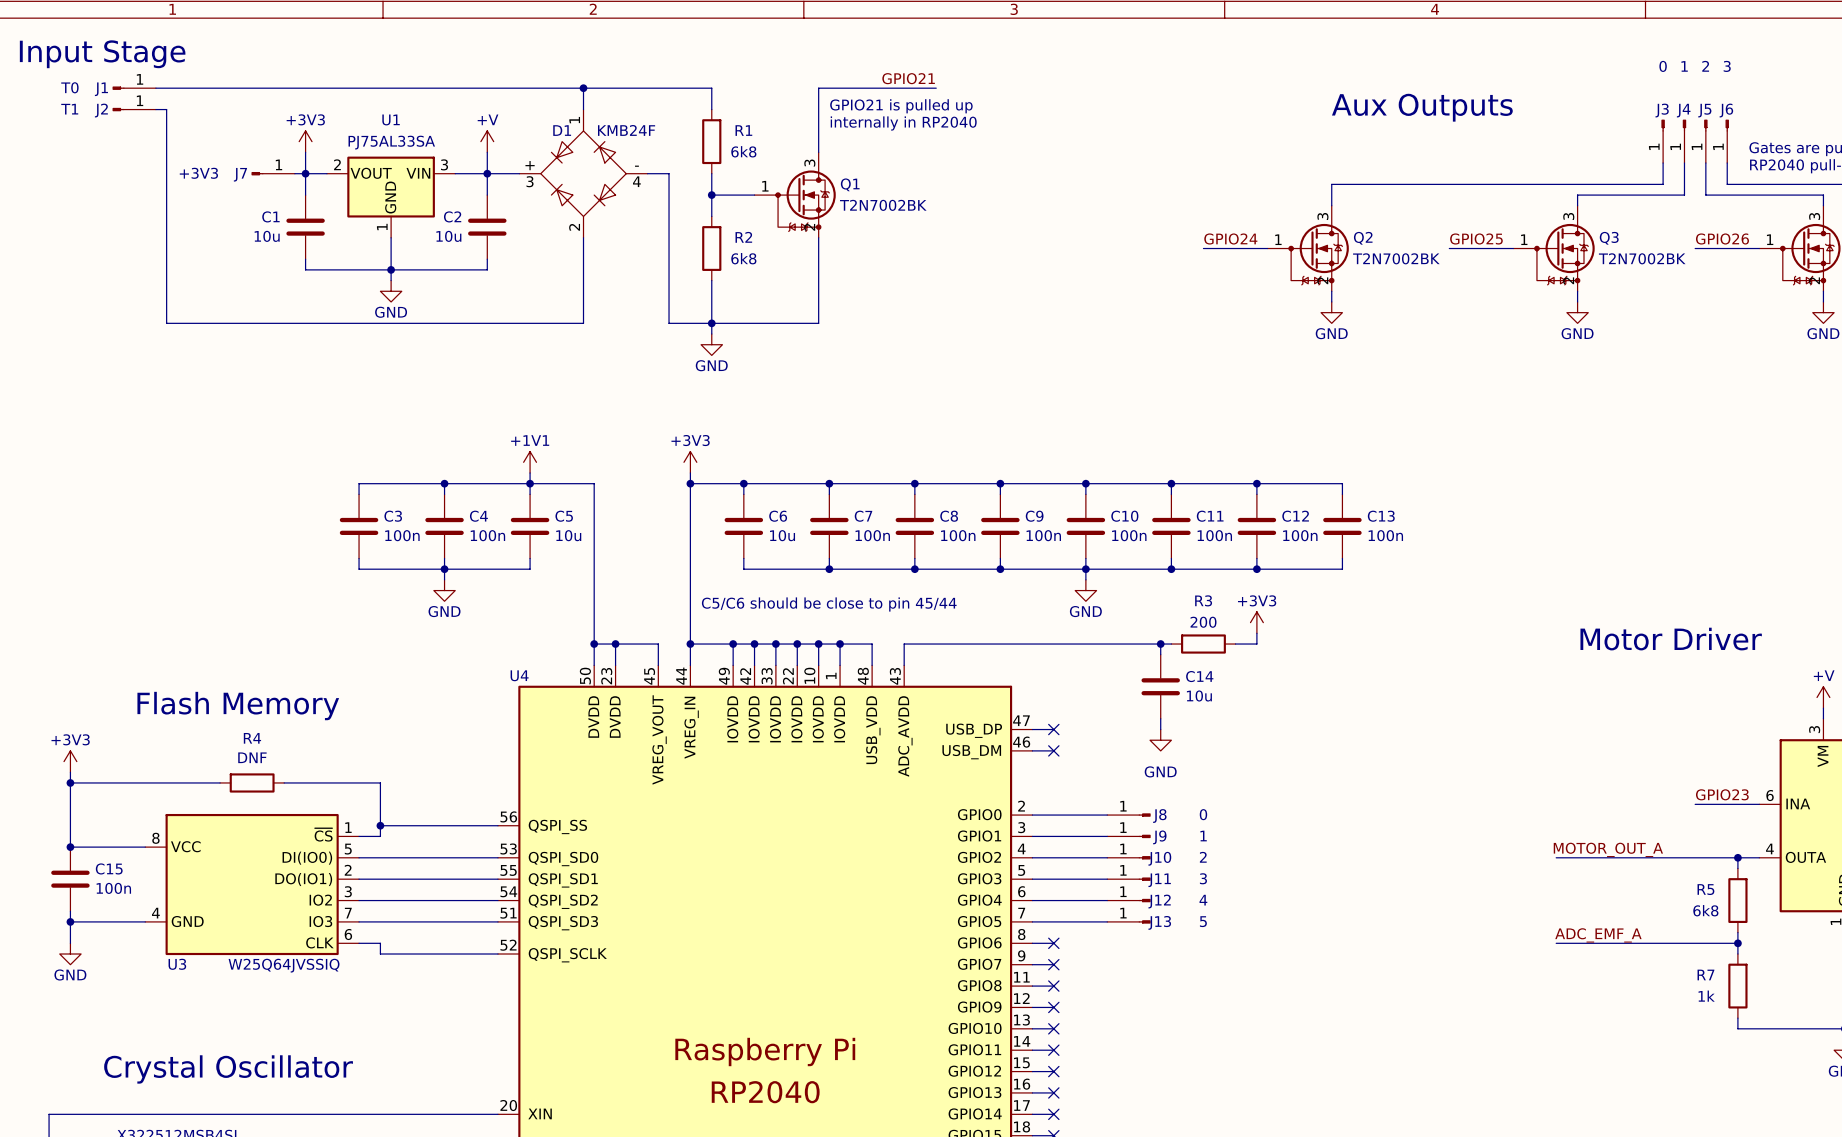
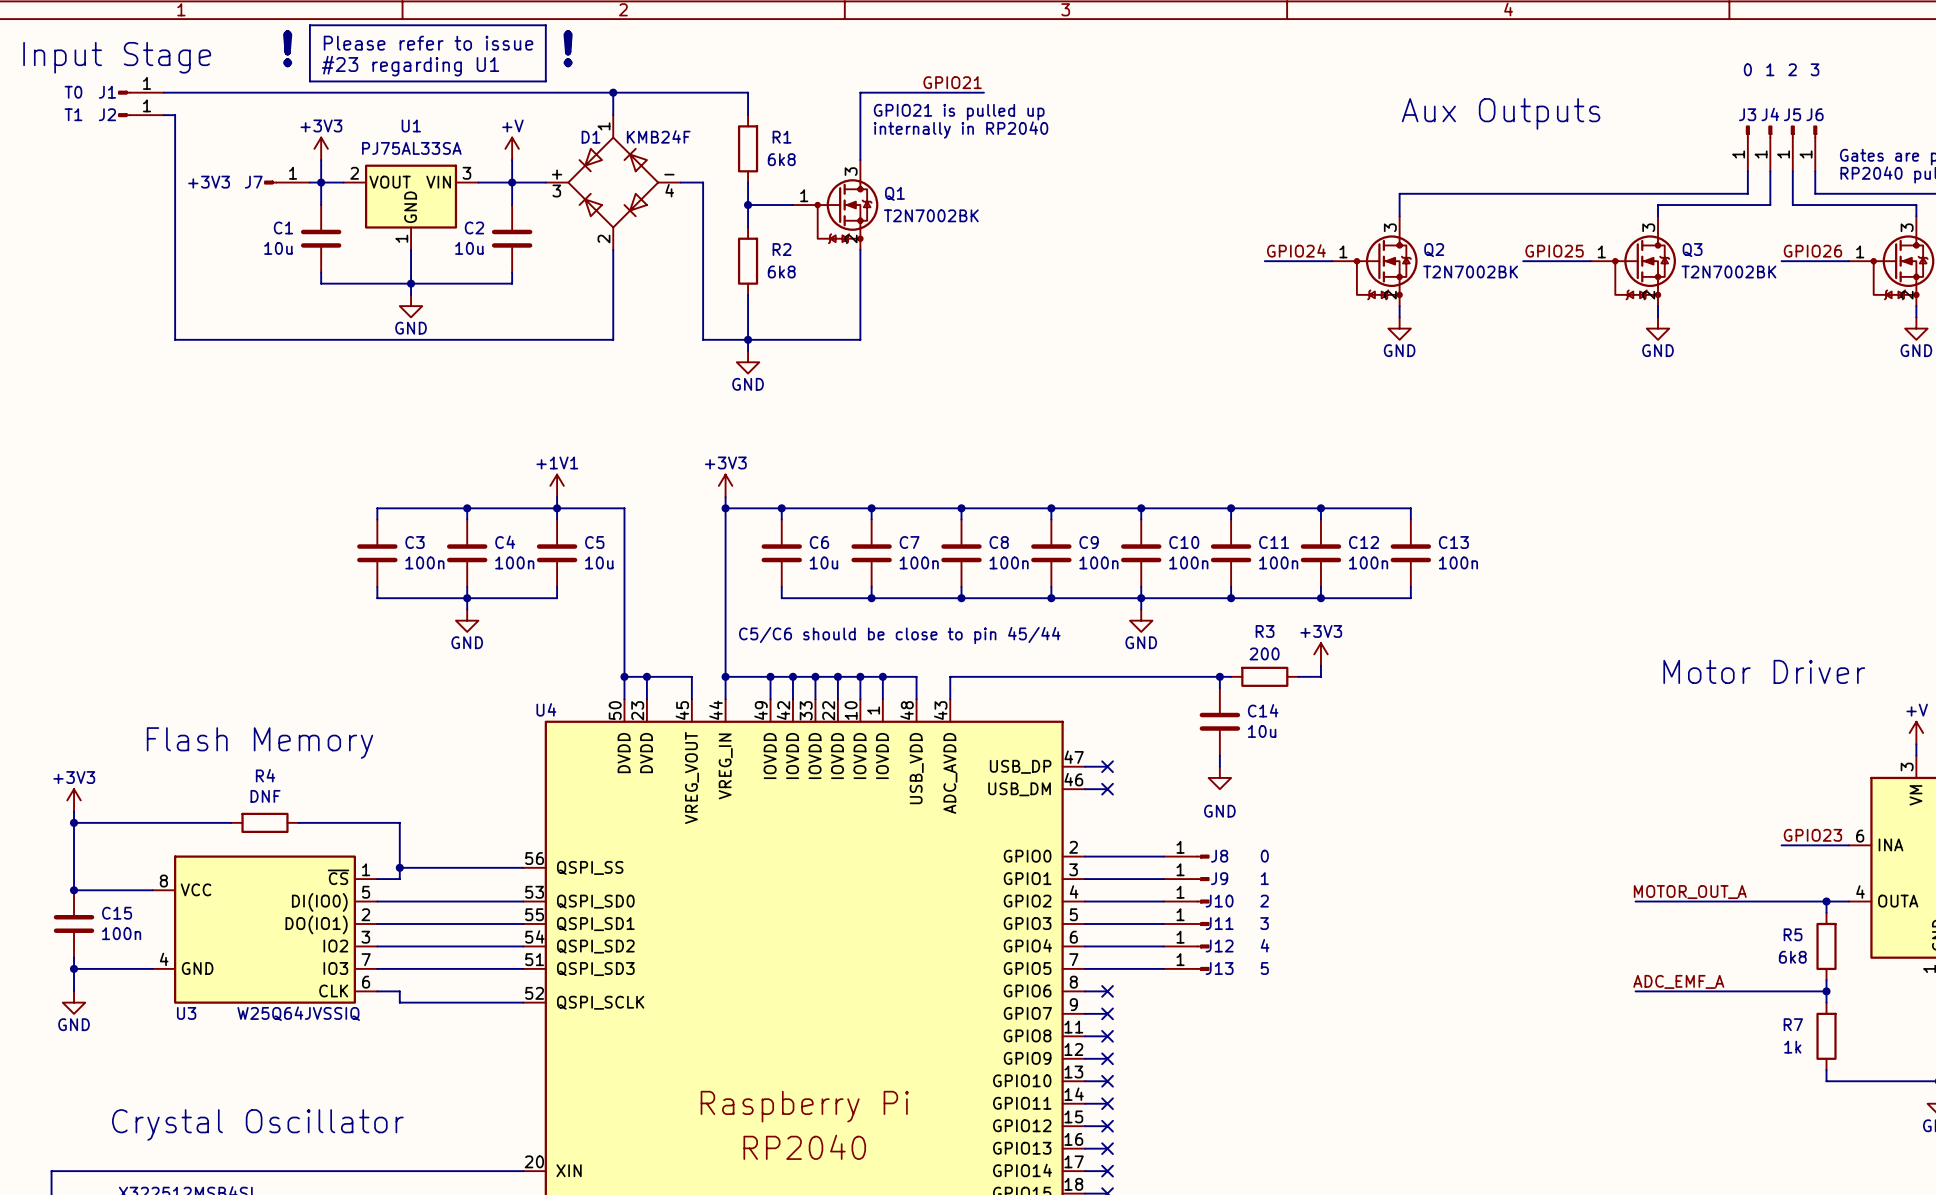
line: none -> (309, 25) (545, 25) (545, 81) (309, 81) (309, 25)
text: none -> Please refer to issue (428, 43)
text: none -> ! (287, 48)
text: none -> ! (568, 48)
text: none -> #23 regarding U1 (410, 66)

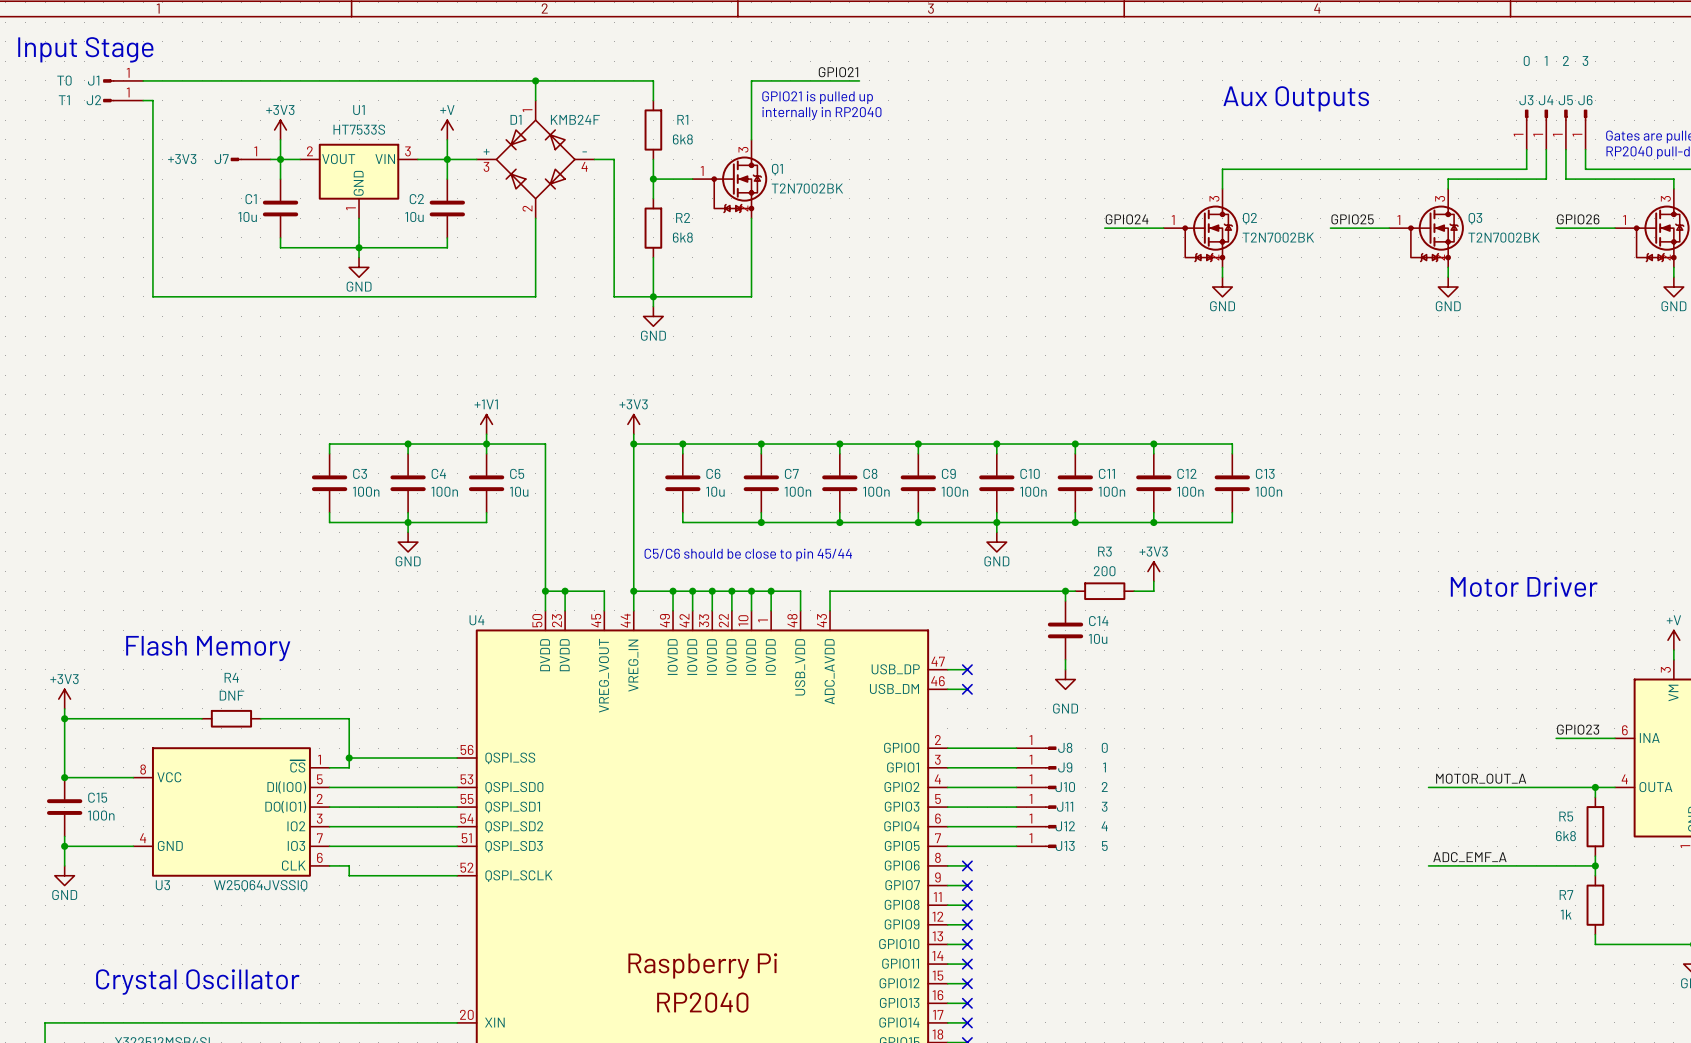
line: (309, 25) (545, 25) (545, 81) (309, 81) (309, 25) -> none
text: Please refer to issue (428, 43) -> none
text: ! (287, 48) -> none
text: ! (568, 48) -> none
text: #23 regarding U1 (410, 66) -> none
U1 value: PJ75AL33SA (411, 148) -> HT7533S (359, 129)

